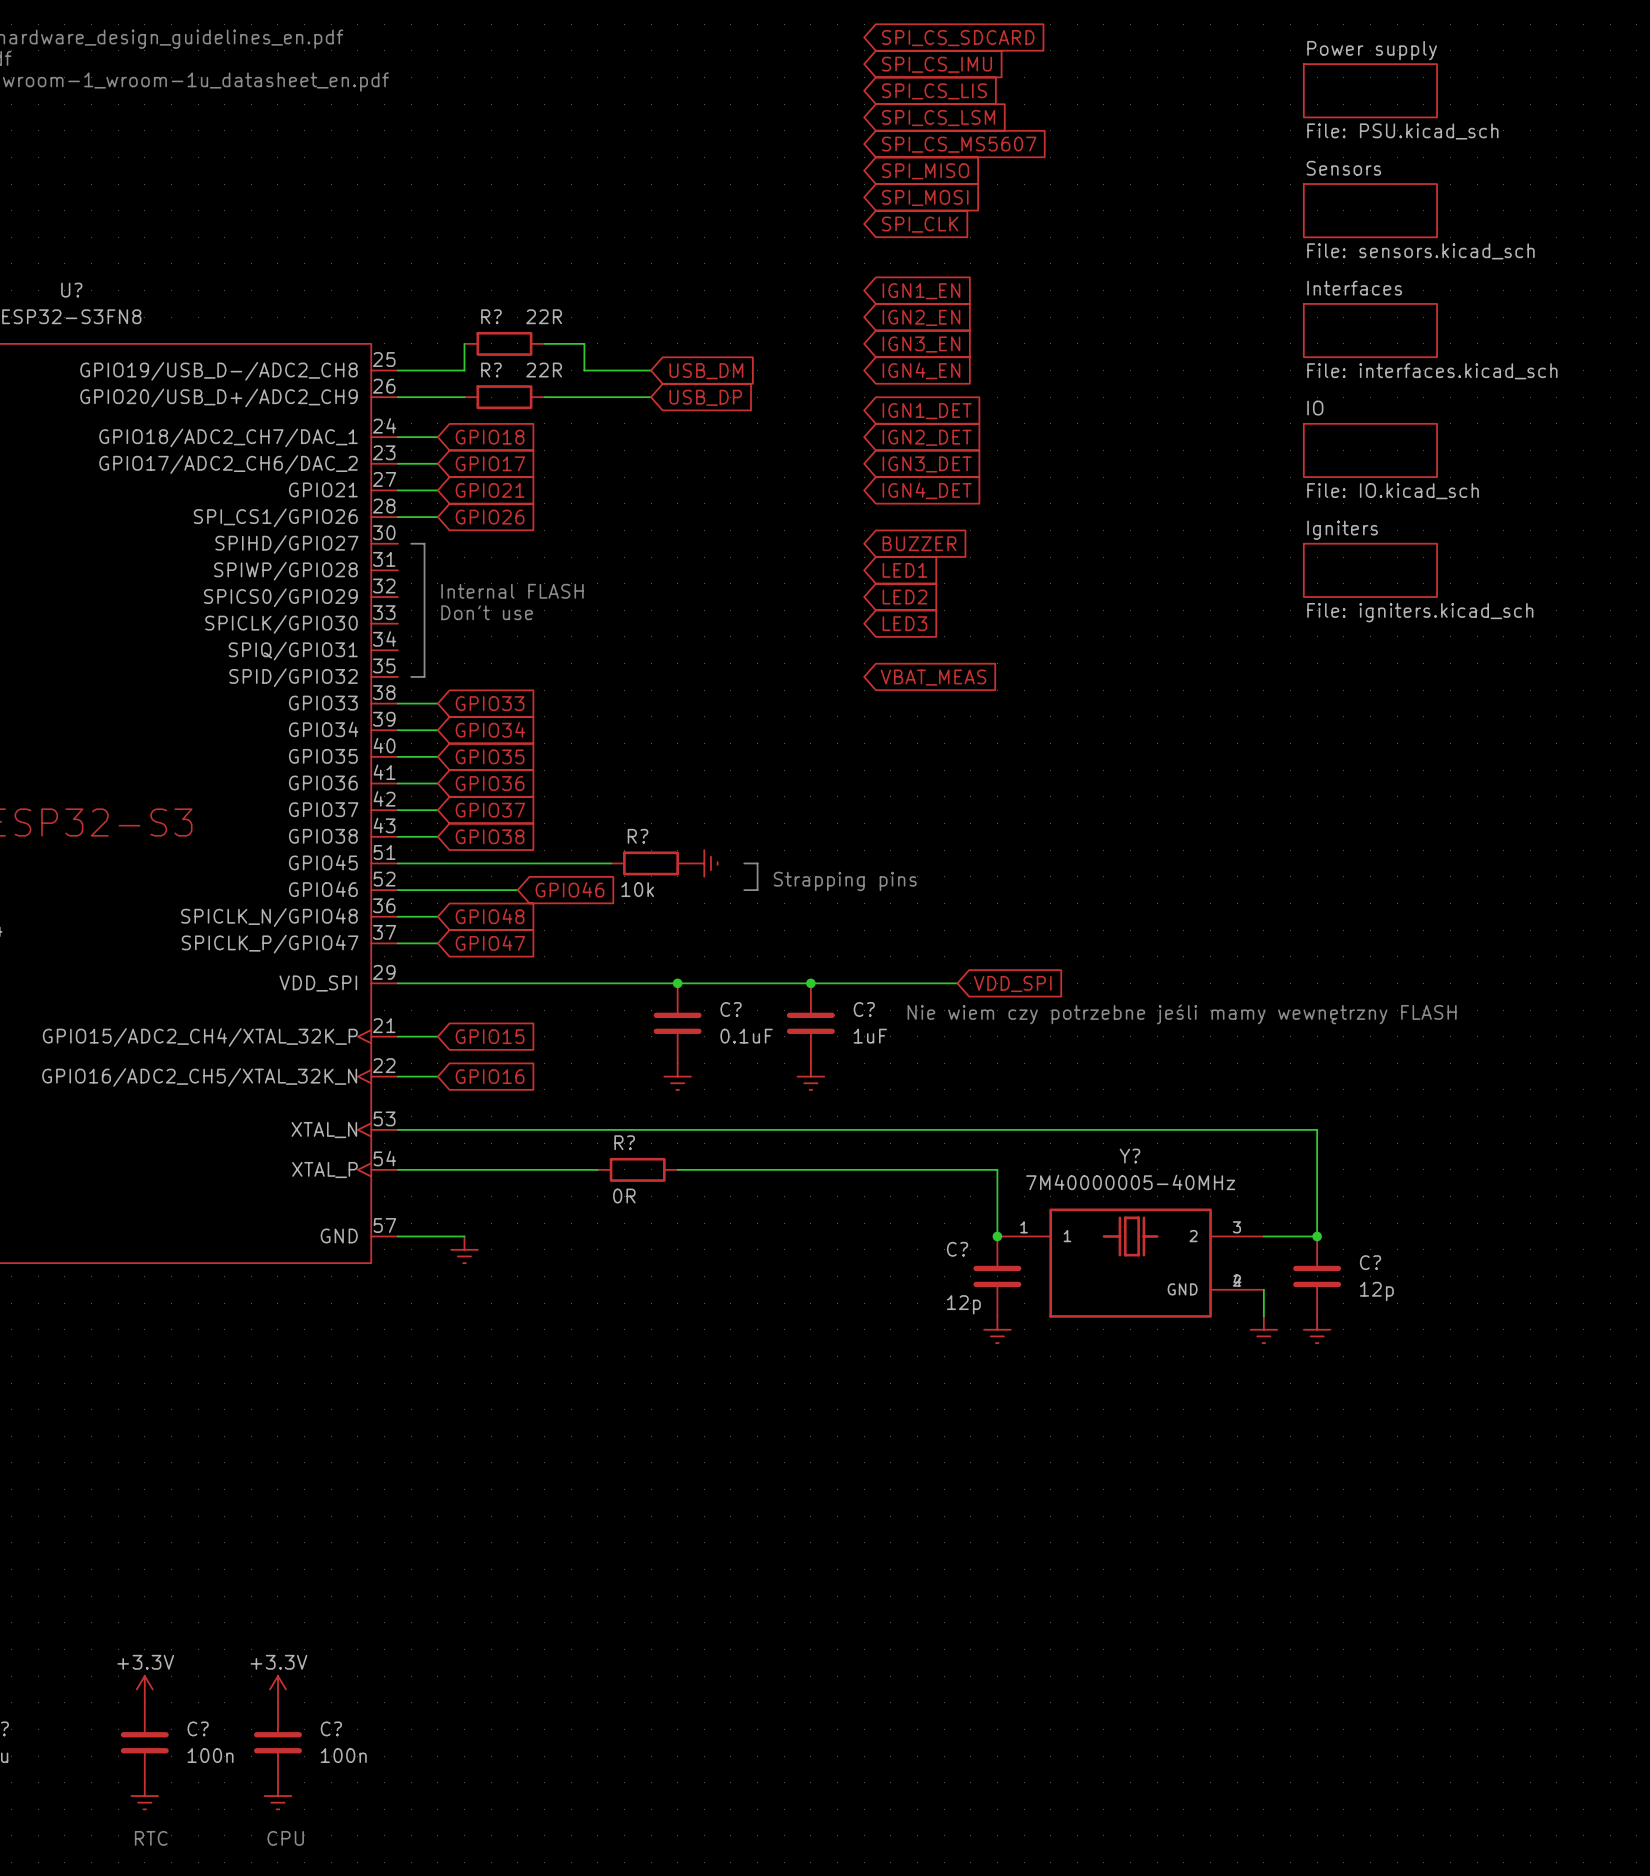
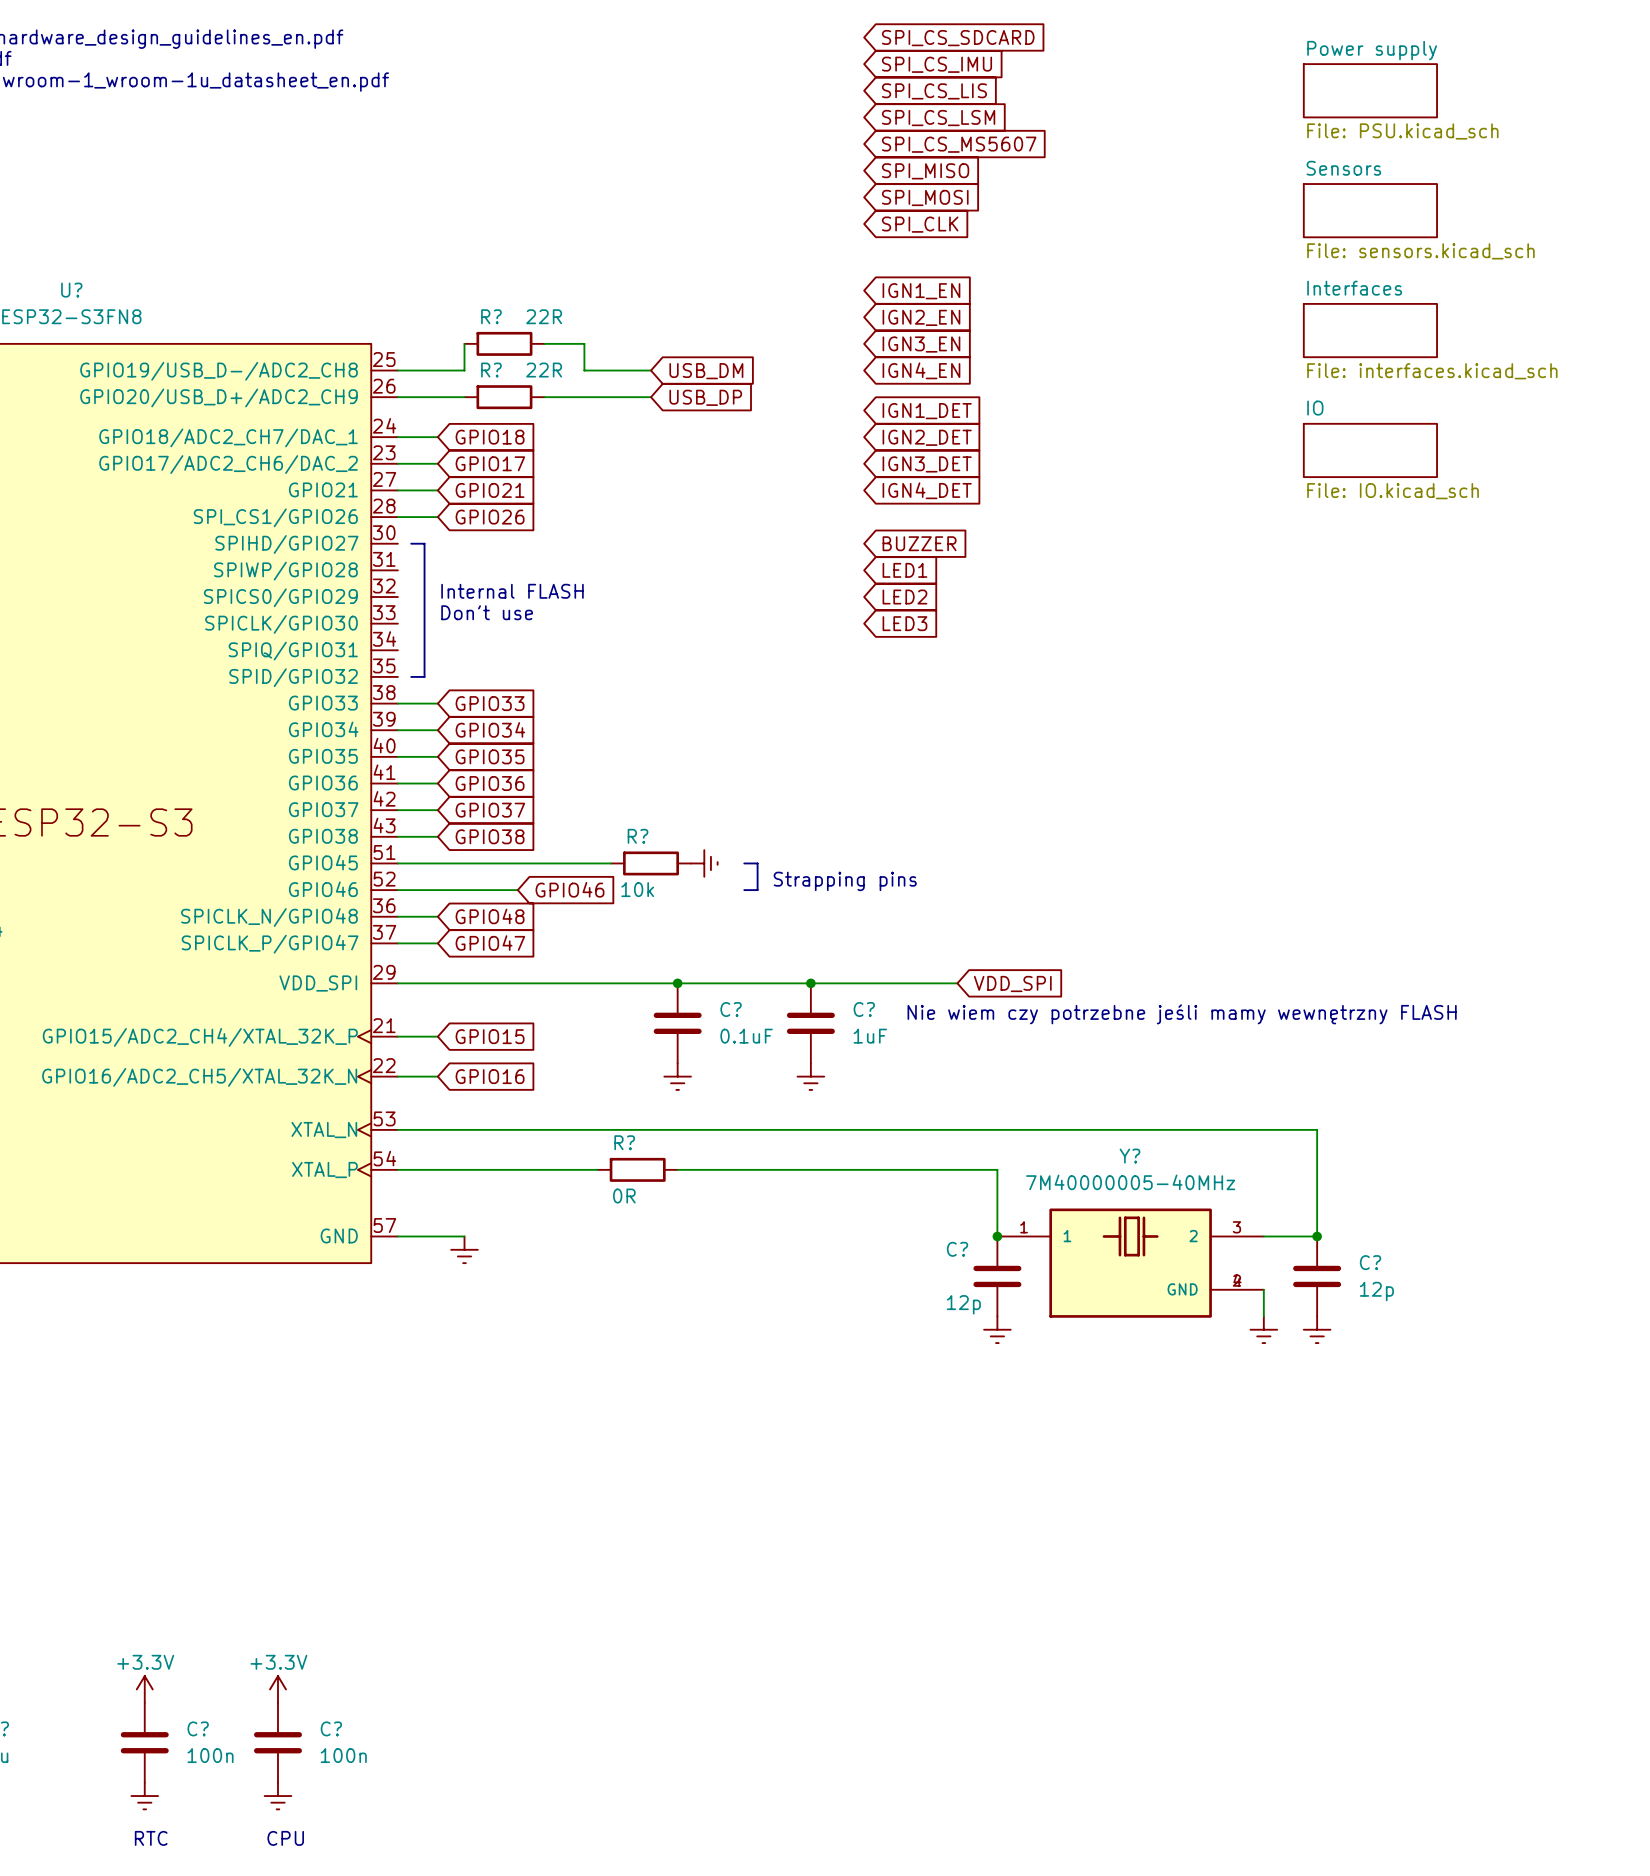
sheet Igniters: File: igniters.kicad_sch (1370, 570) -> none
global label: VBAT_MEAS (933, 677) -> none

